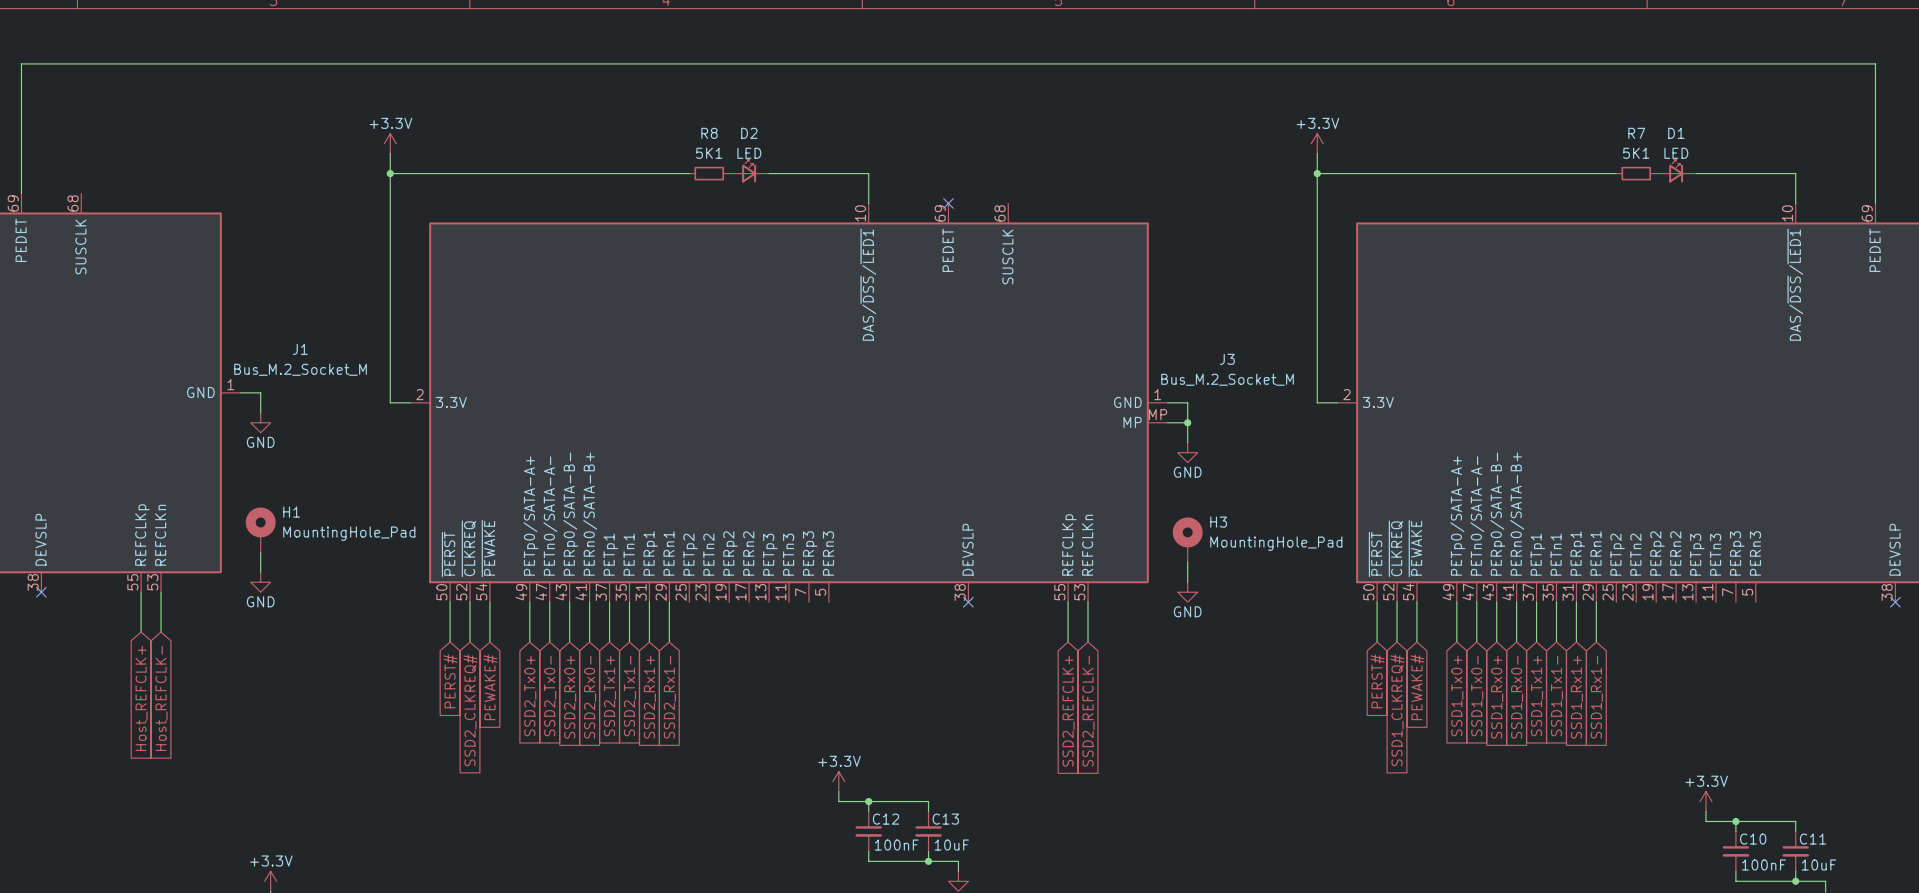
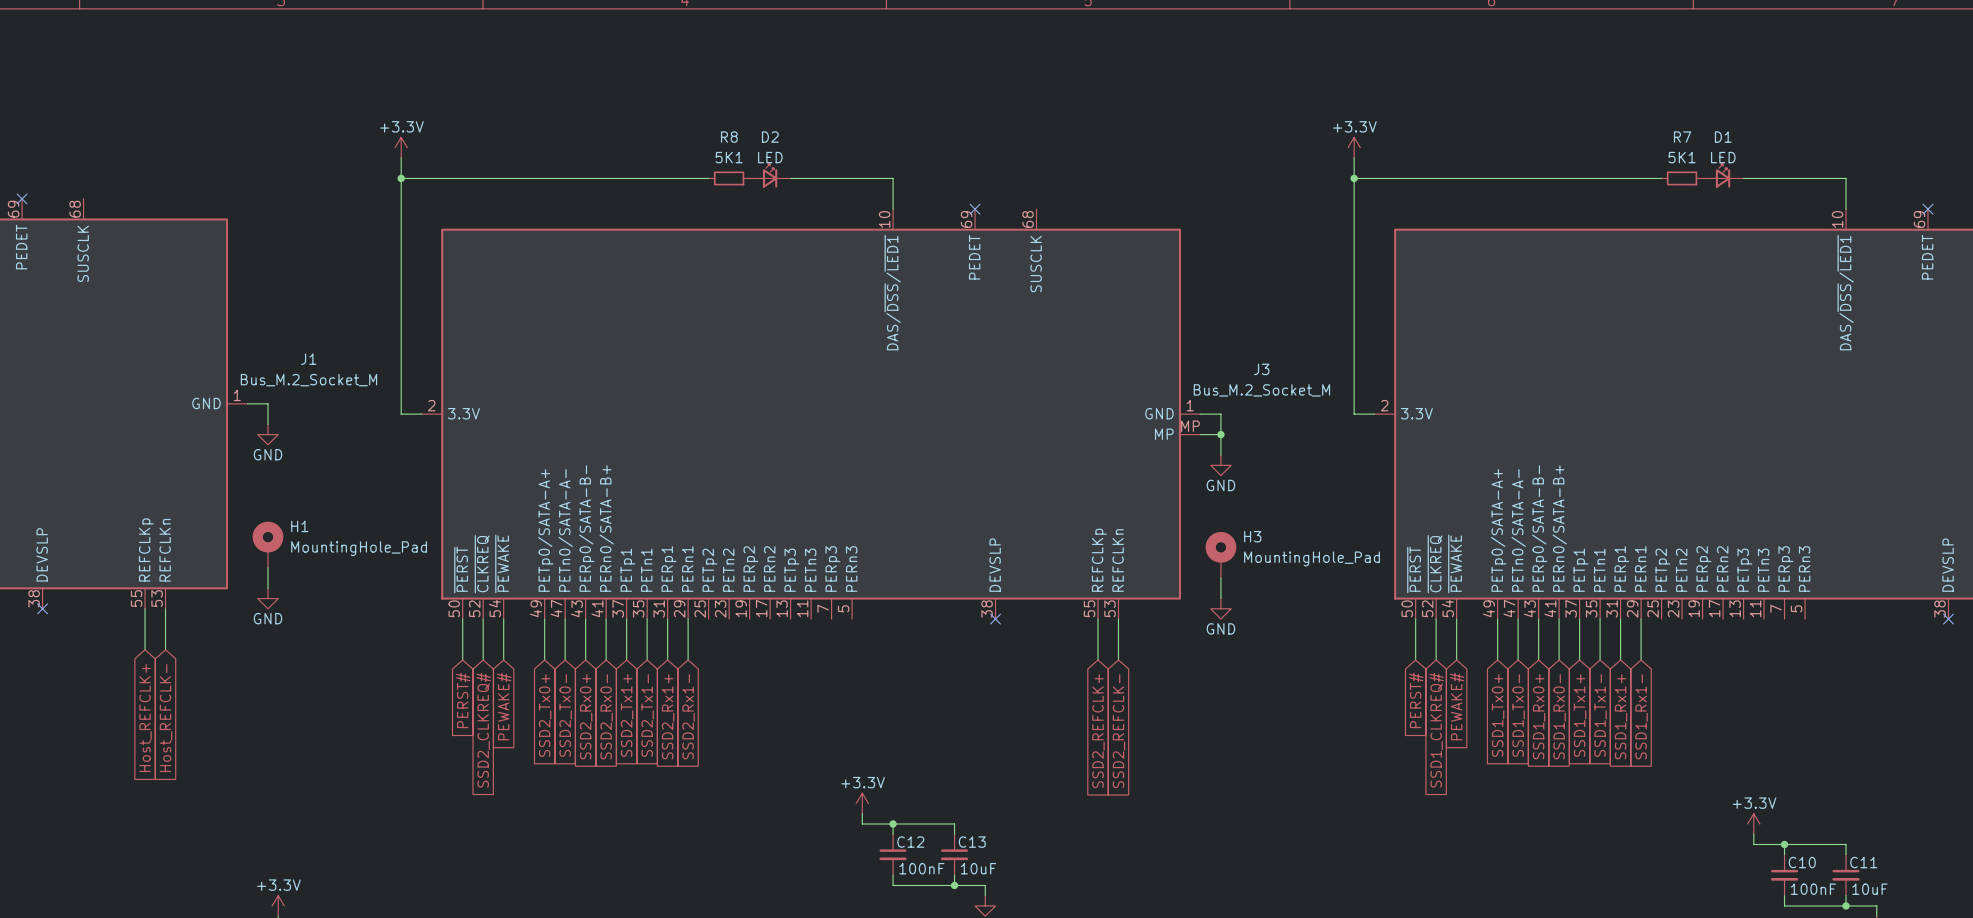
wire: (21, 193) (21, 63) (1875, 63) (1875, 203) -> none
no-connect mark: none -> (22, 198)
no-connect mark: none -> (1927, 209)

